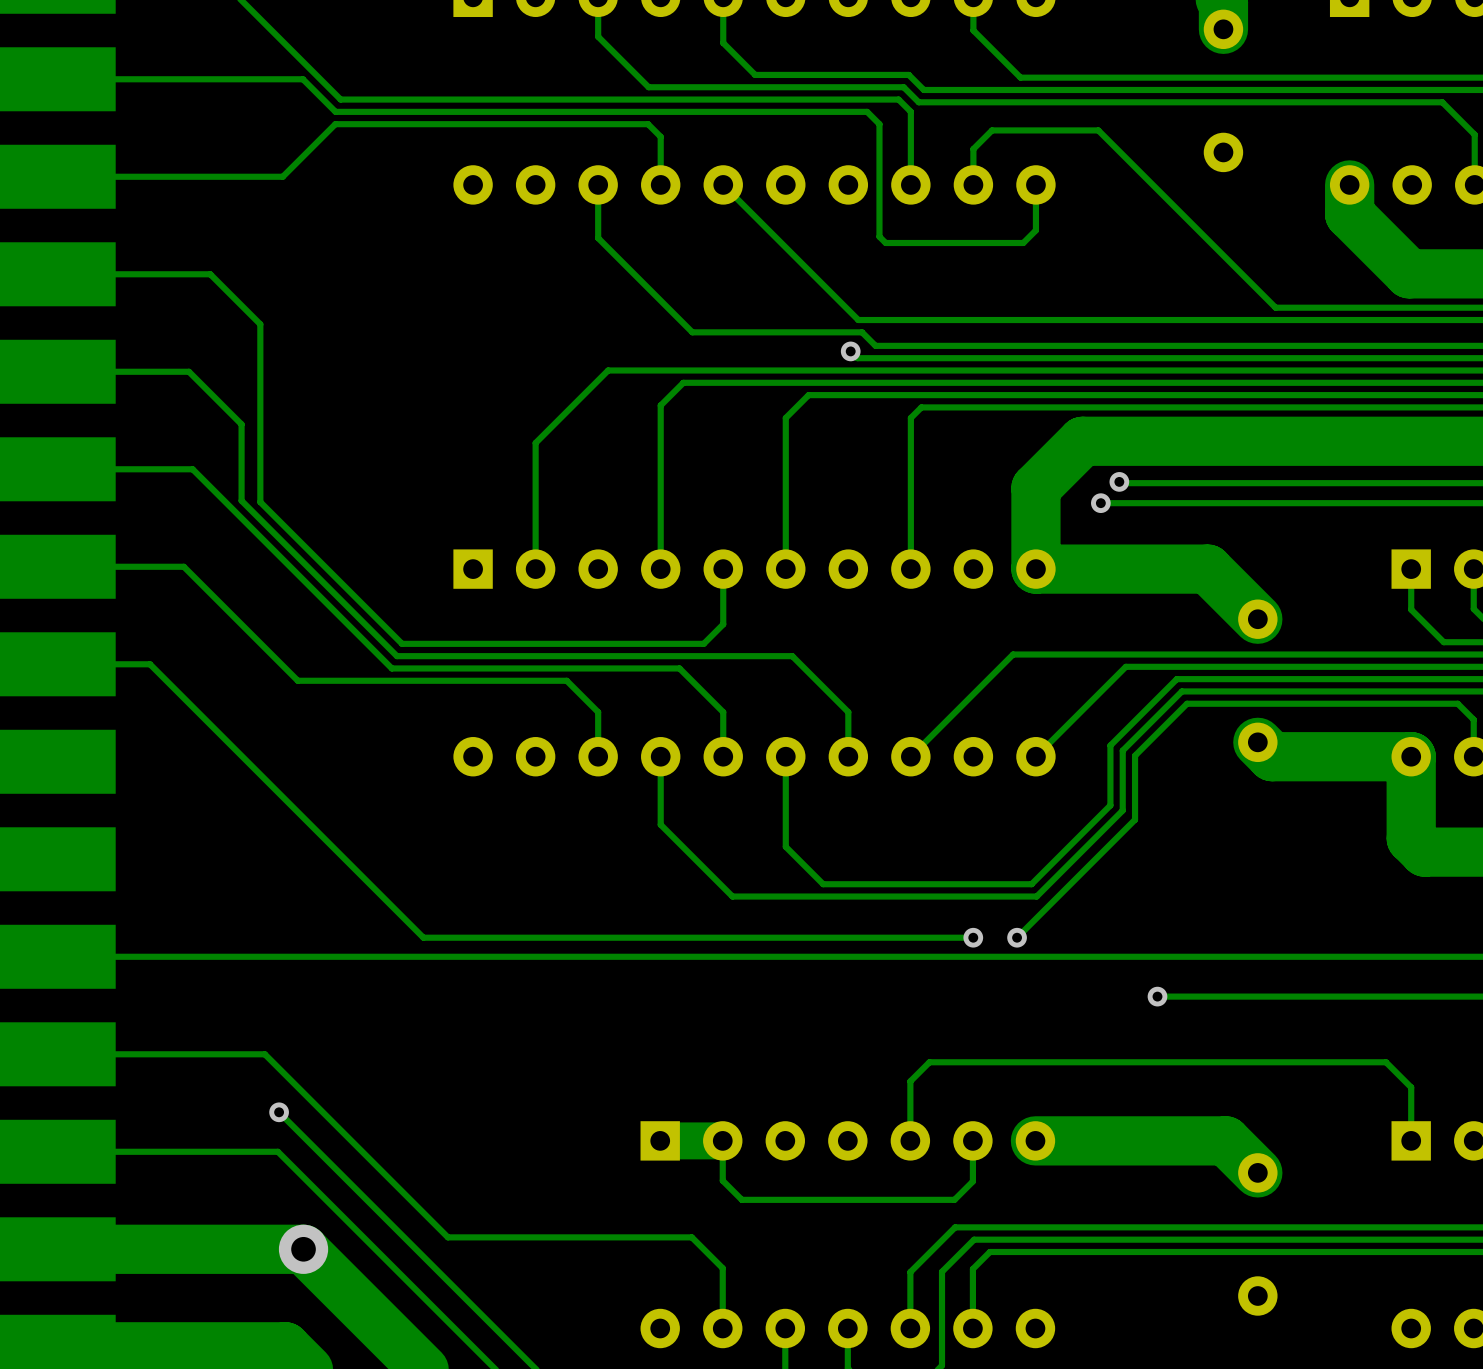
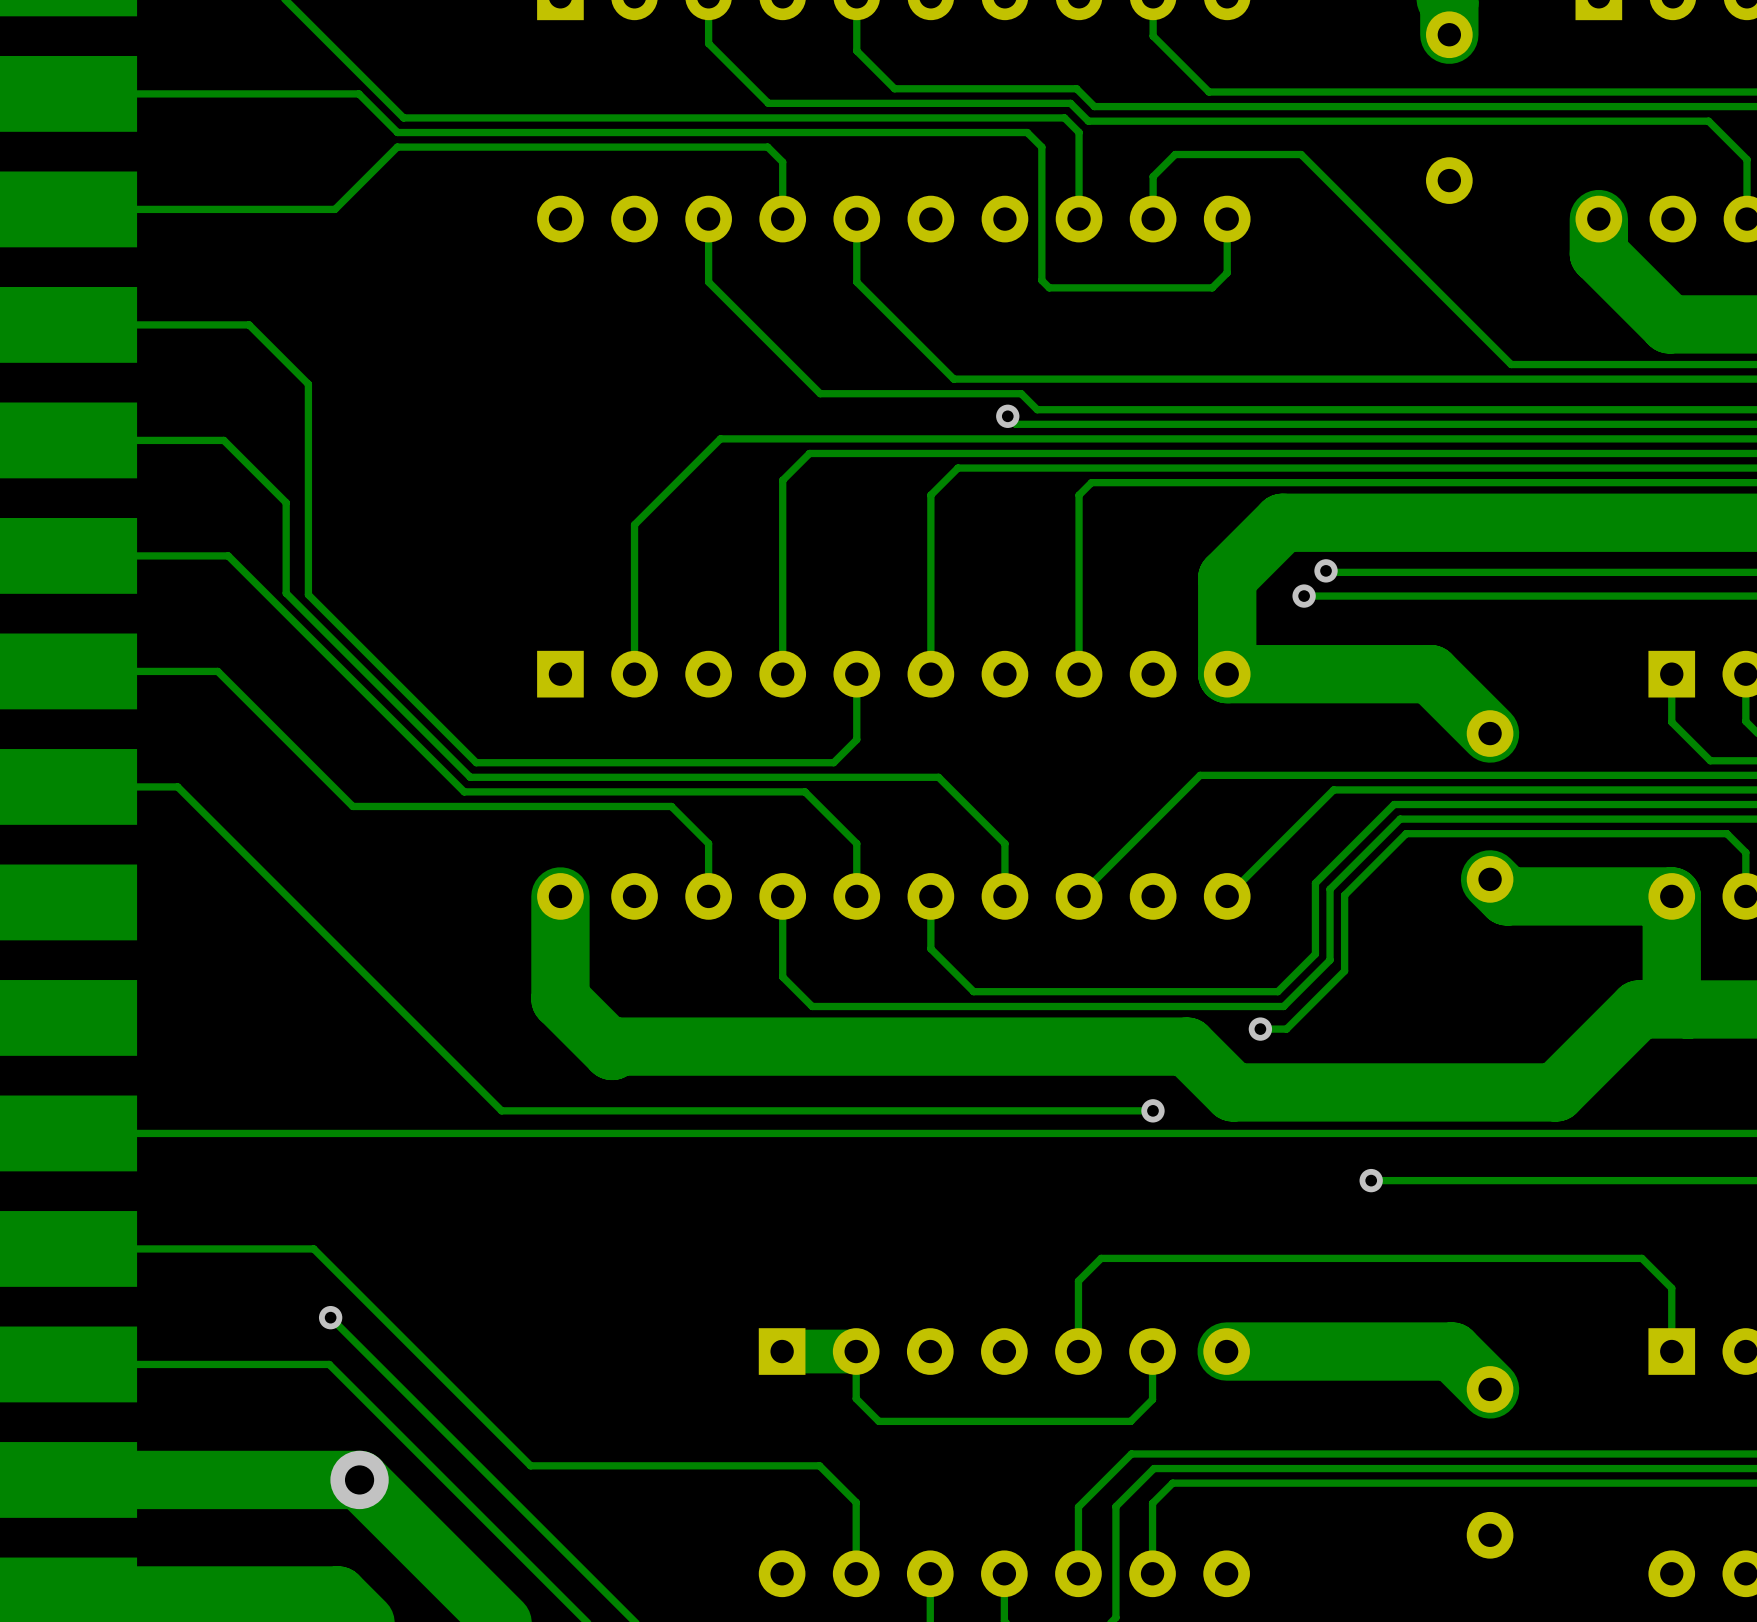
track: (723, 184) (858, 320) -> (856, 219) (856, 282) (953, 379) (1016, 379)
track: none -> (560, 896) (560, 999) (612, 1050) (616, 1046) (1187, 1046) (1232, 1092) (1556, 1092) (1638, 1009) (1687, 1009)
track: (785, 800) (785, 846) (823, 884) (1031, 884) (1078, 837) -> (930, 948) (973, 991) (1277, 991)
track: (1083, 849) (1036, 896) (732, 896) (685, 849) -> (1283, 1006) (812, 1006)
track: (1086, 868) (1017, 937) -> (1286, 1029) (1260, 1029)
via position: (1017, 937) -> (1260, 1029)

